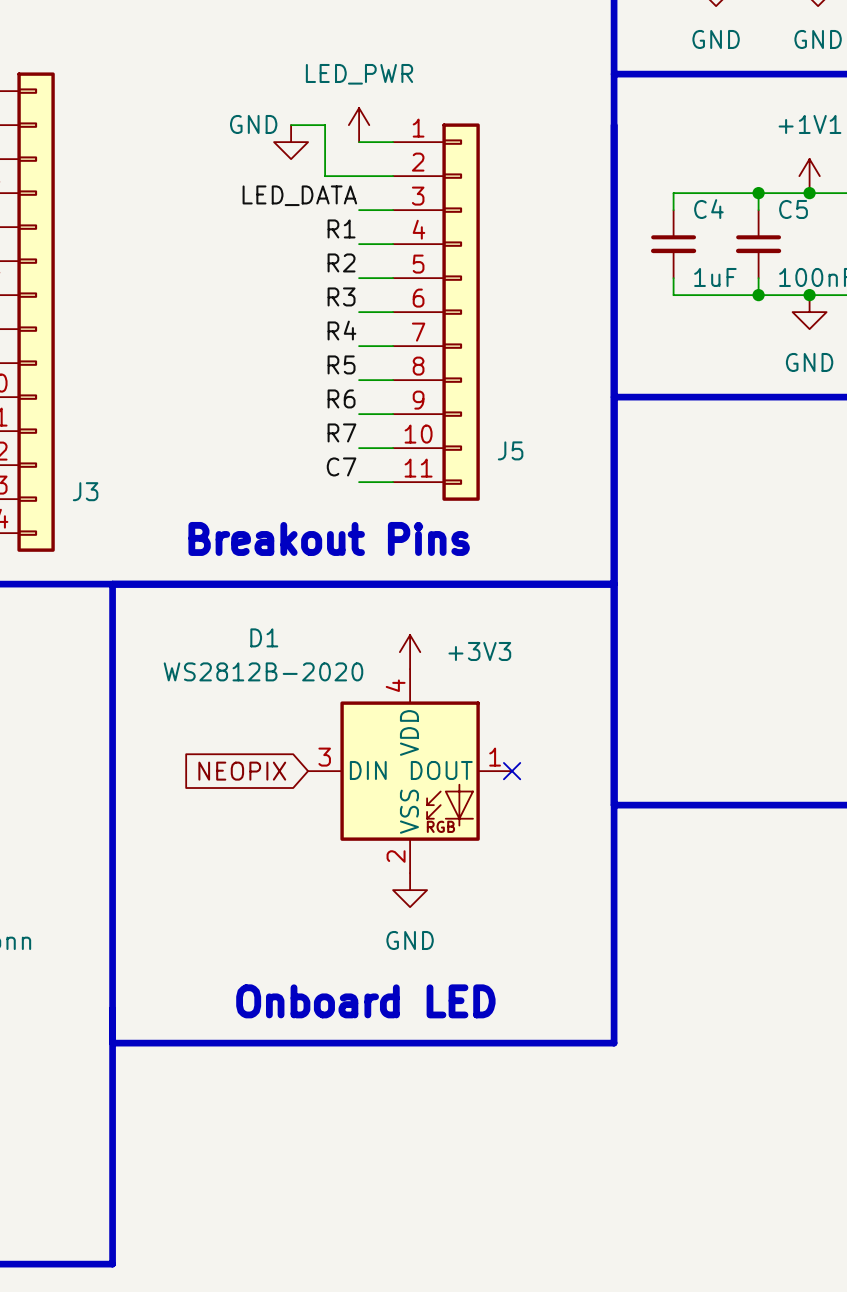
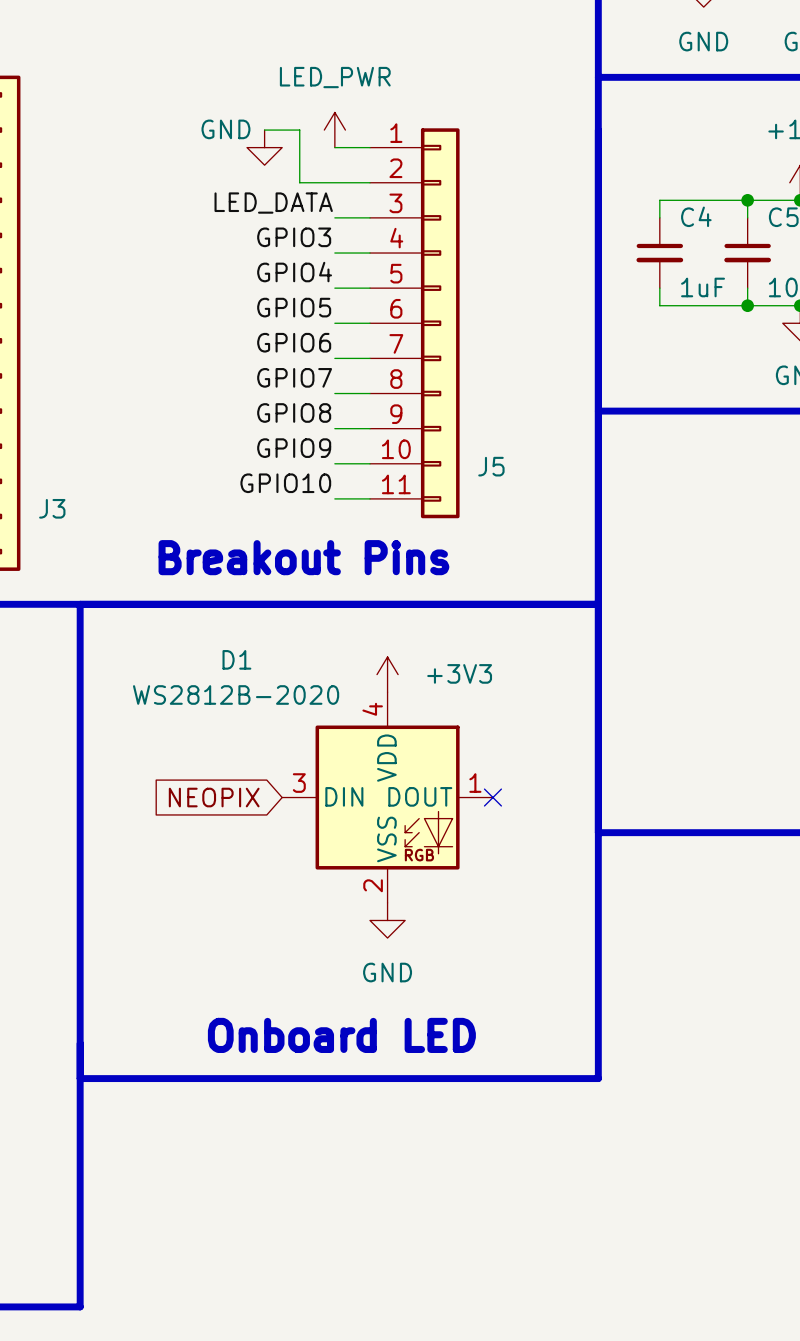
label: R1 (341, 228) -> GPIO3 (294, 237)
label: R2 (341, 262) -> GPIO4 (294, 272)
label: R3 (341, 296) -> GPIO5 (294, 307)
label: R4 (341, 330) -> GPIO6 (294, 342)
label: R5 (341, 364) -> GPIO7 (294, 377)
label: R6 (341, 398) -> GPIO8 (294, 412)
label: R7 (341, 432) -> GPIO9 (294, 448)
label: C7 (341, 466) -> GPIO10 (285, 483)

